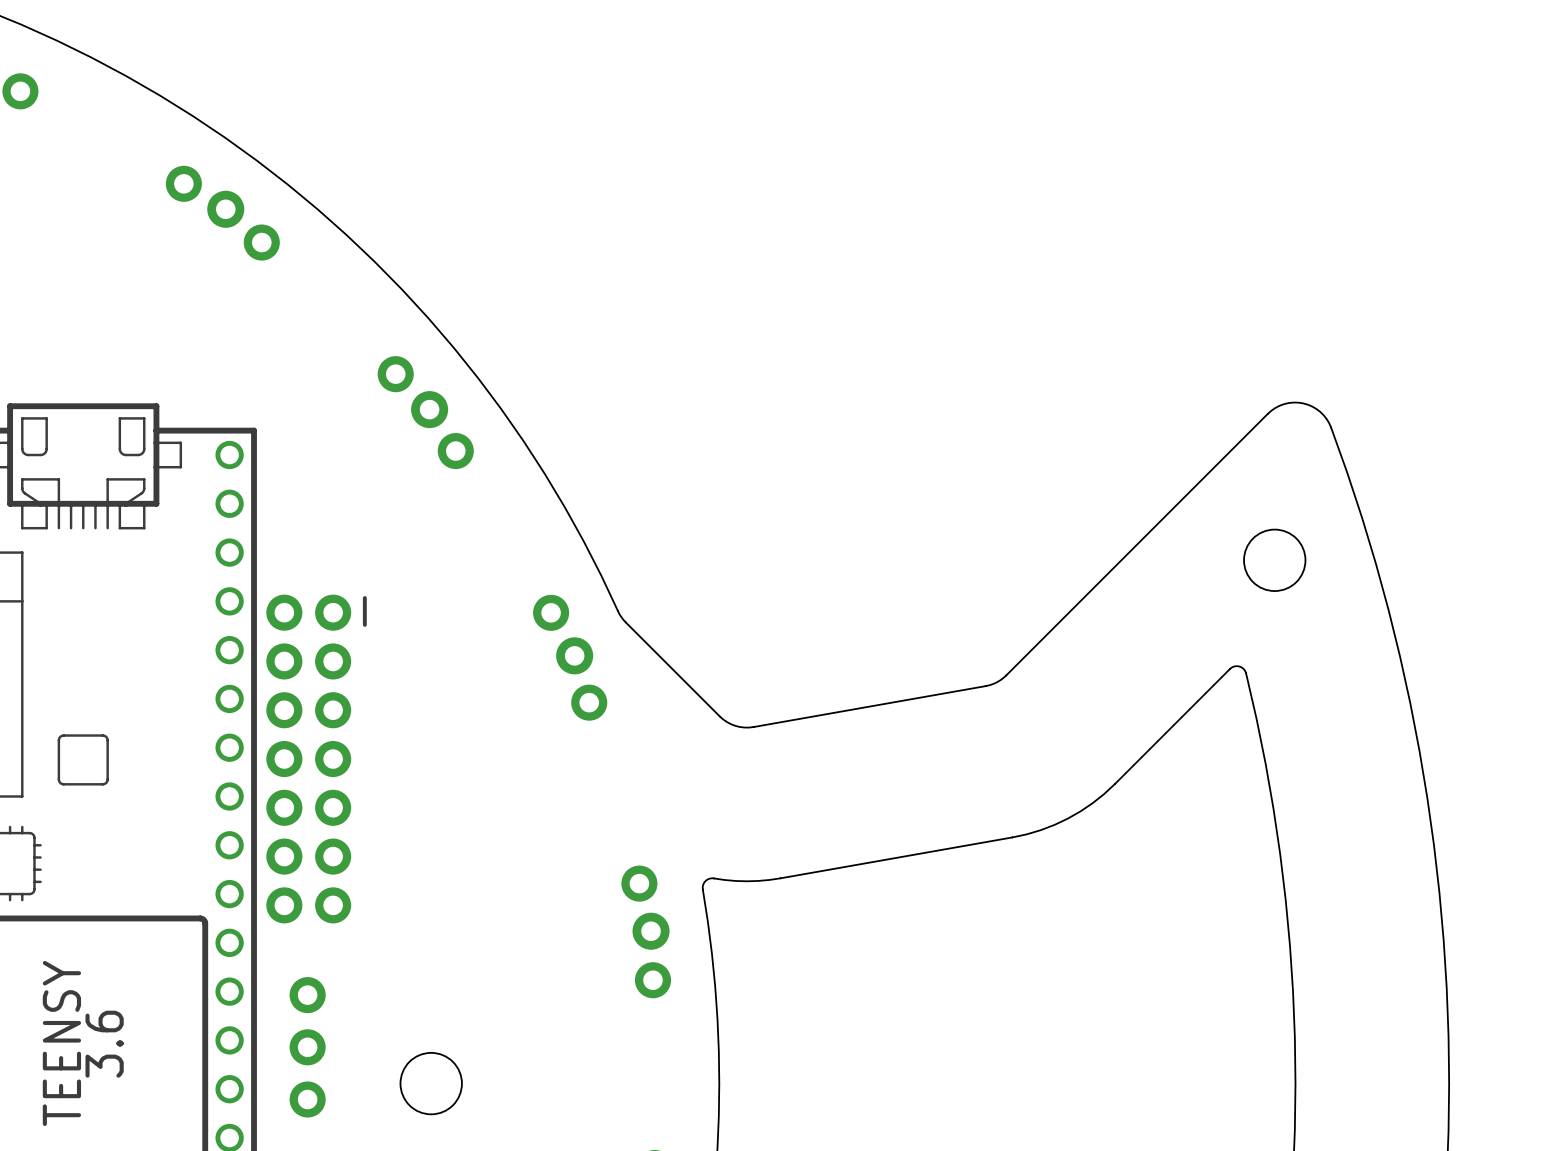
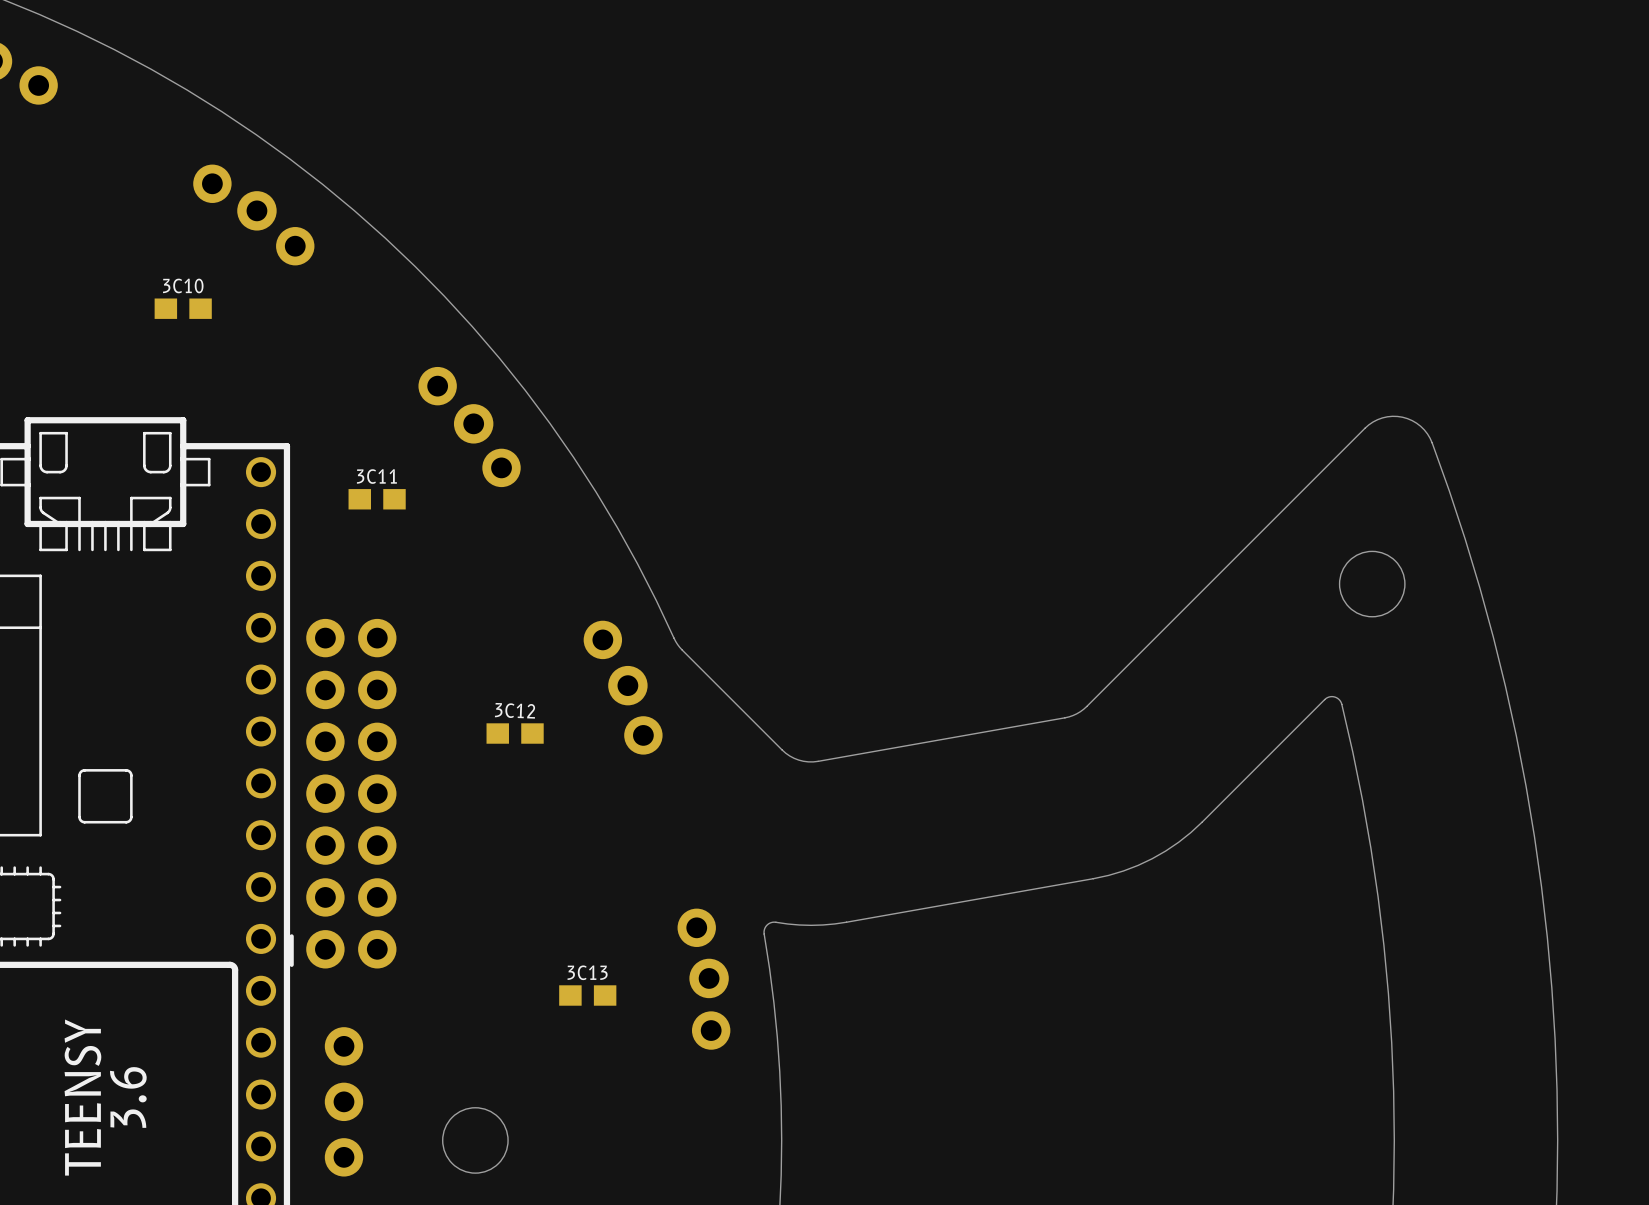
3C10: none -> (183, 308)
3C11: none -> (377, 499)
3C12: none -> (515, 733)
part rotation: 0° (316, 759) -> 180° (343, 793)
3C13: none -> (587, 995)

